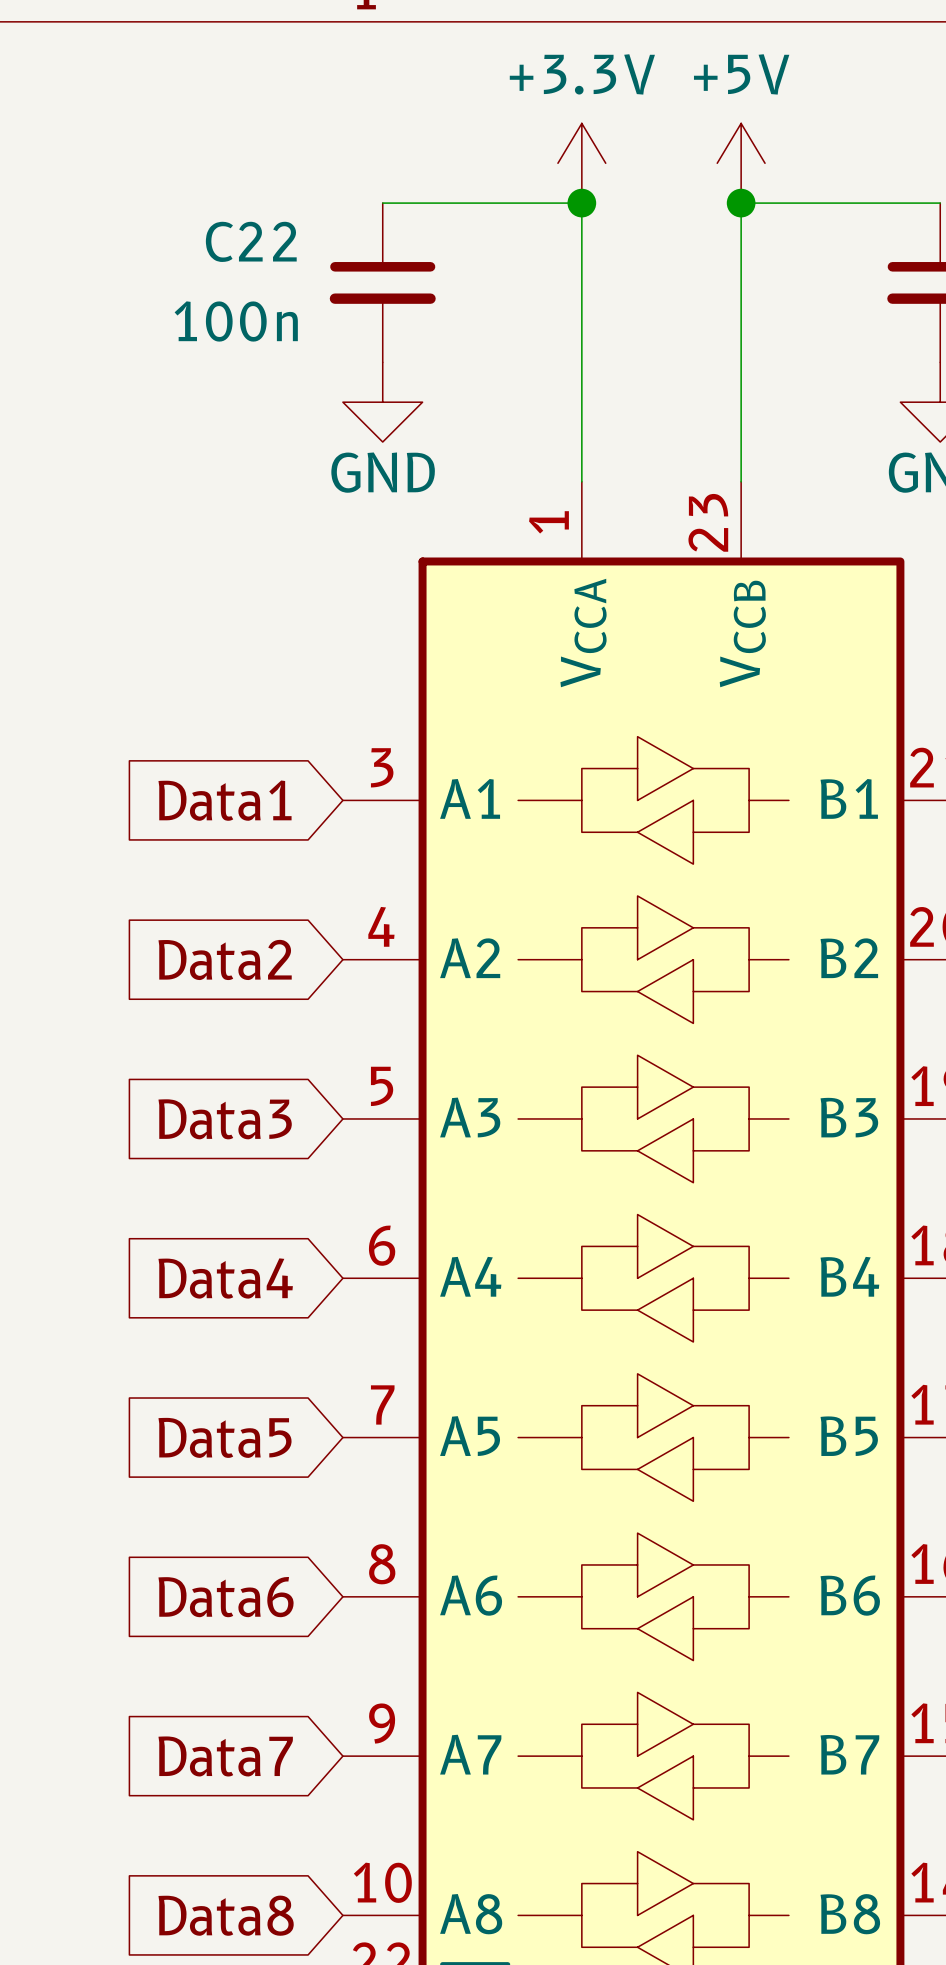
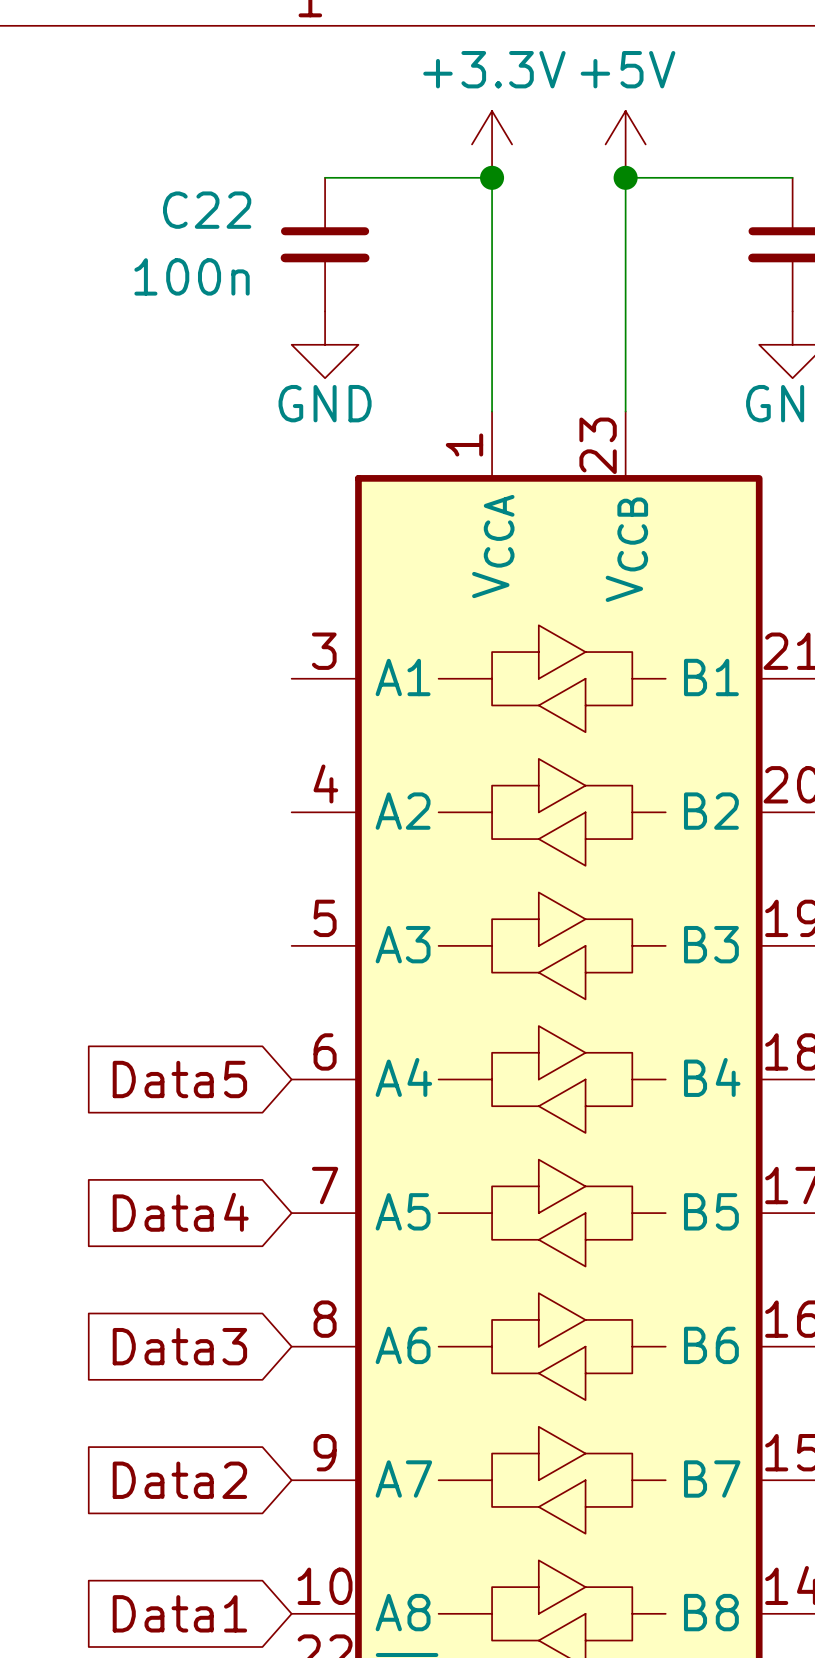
global label: Data1 (225, 800) -> none
global label: Data2 (225, 959) -> none
global label: Data3 (225, 1119) -> none
global label: Data4 (225, 1278) -> Data5 (179, 1079)
global label: Data5 (225, 1437) -> Data4 (180, 1212)
global label: Data6 (226, 1597) -> Data3 (179, 1346)
global label: Data7 (225, 1756) -> Data2 (179, 1480)
global label: Data8 (226, 1915) -> Data1 (179, 1613)

